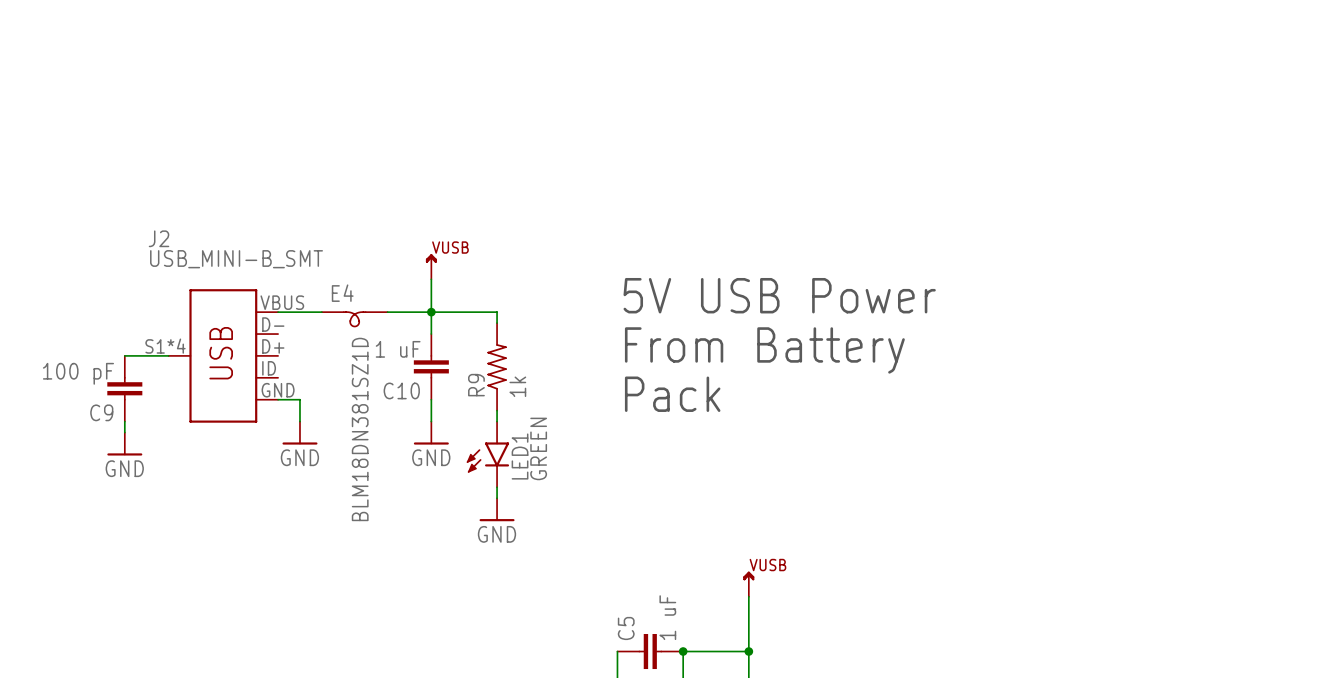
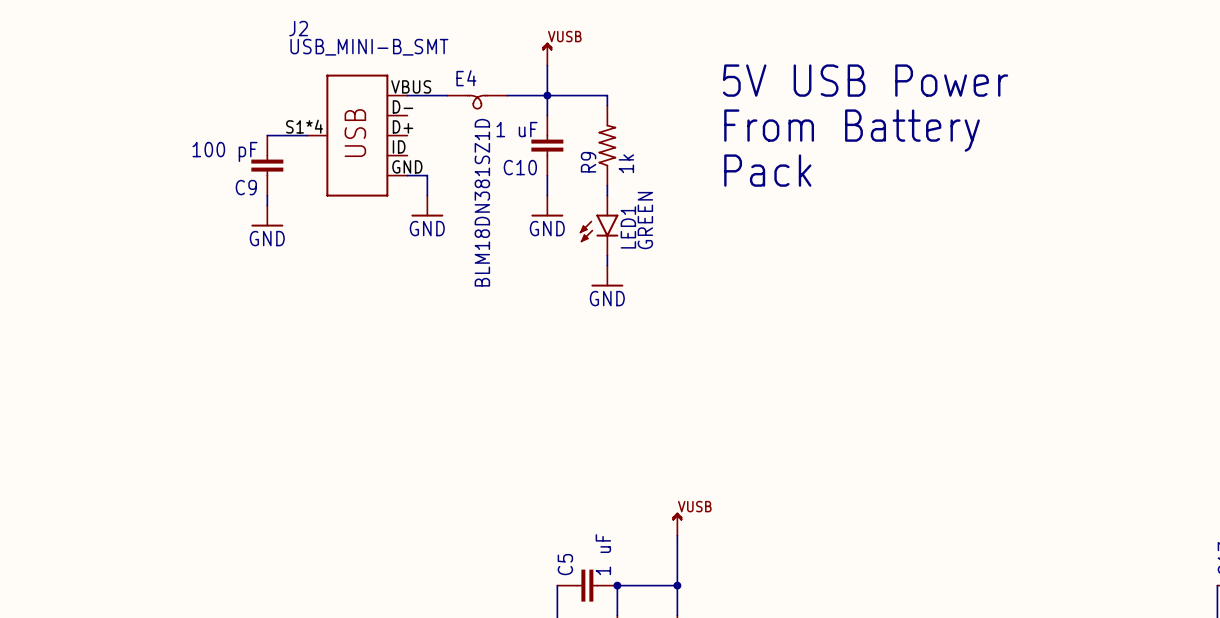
power symbol: none -> (547, 54)
wire: none -> (547, 65) (547, 115)
text: none -> 5V USB Power (865, 80)
wire: none -> (407, 95) (447, 95)
wire: none -> (507, 95) (607, 95) (607, 105)
junction: none -> (547, 95)
text: none -> From Battery (852, 130)
text: none -> Pack (767, 170)
wire: none -> (407, 175) (427, 175) (427, 195)
wire: none -> (547, 175) (547, 195)
wire: none -> (607, 185) (607, 195)
wire: none -> (267, 195) (267, 205)
power symbol: none -> GND (427, 206)
power symbol: none -> GND (547, 206)
power symbol: none -> GND (267, 216)
power symbol: (431, 266) -> none
wire: (431, 279) (431, 334) -> none
text: 5V USB Power (779, 295) -> none
wire: (278, 312) (321, 312) -> (267, 135) (307, 135)
wire: (387, 312) (497, 312) (497, 323) -> none
junction: (431, 312) -> none
power symbol: none -> GND (607, 276)
E4 position: (354, 319) -> (477, 102)
text: From Battery (764, 350) -> none
wire: (124, 355) (168, 355) -> none
J2 position: (223, 355) -> (357, 135)
C10 position: (431, 366) -> (547, 145)
R9 position: (497, 366) -> (607, 145)
C9 position: (124, 388) -> (267, 165)
text: Pack (672, 394) -> none
wire: (278, 399) (299, 399) (299, 421) -> none
wire: (431, 399) (431, 421) -> none
wire: (497, 410) (497, 421) -> (607, 255) (607, 265)
wire: (124, 421) (124, 432) -> none
power symbol: GND (299, 433) -> none
power symbol: GND (431, 433) -> none
power symbol: GND (124, 444) -> none
LED1 position: (487, 454) -> (599, 225)
wire: (497, 487) (497, 498) -> none
power symbol: GND (497, 509) -> none

